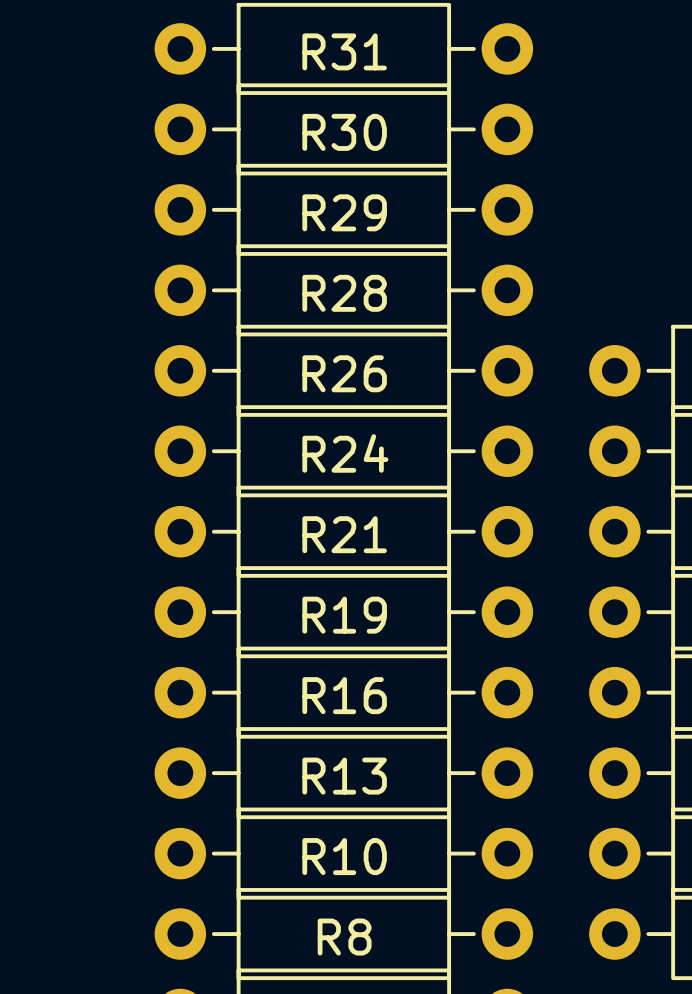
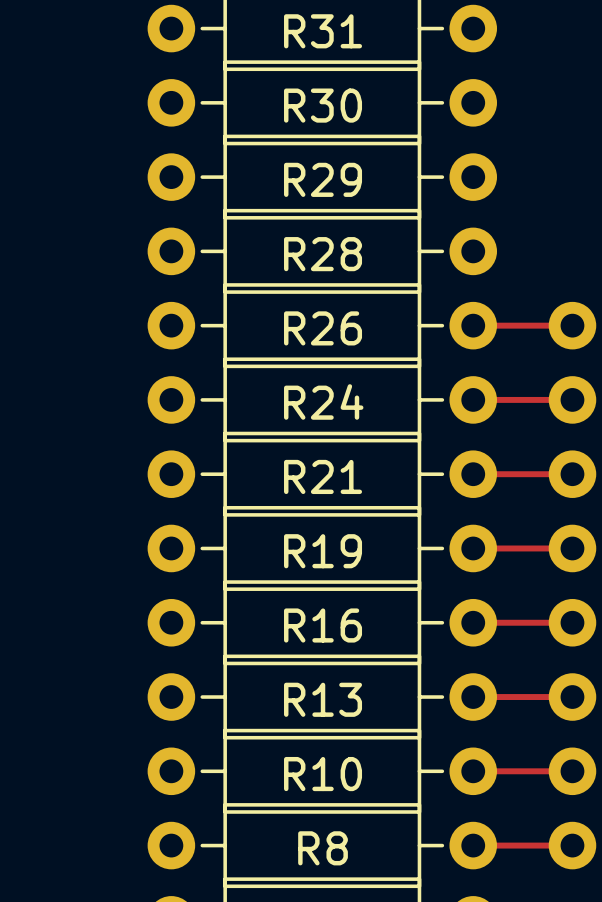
track: none -> (473, 325) (572, 325)
track: none -> (473, 399) (572, 399)
track: none -> (473, 474) (572, 474)
track: none -> (473, 548) (572, 548)
track: none -> (473, 622) (572, 622)
track: none -> (473, 697) (572, 697)
track: none -> (473, 771) (572, 771)
track: none -> (473, 845) (572, 845)

